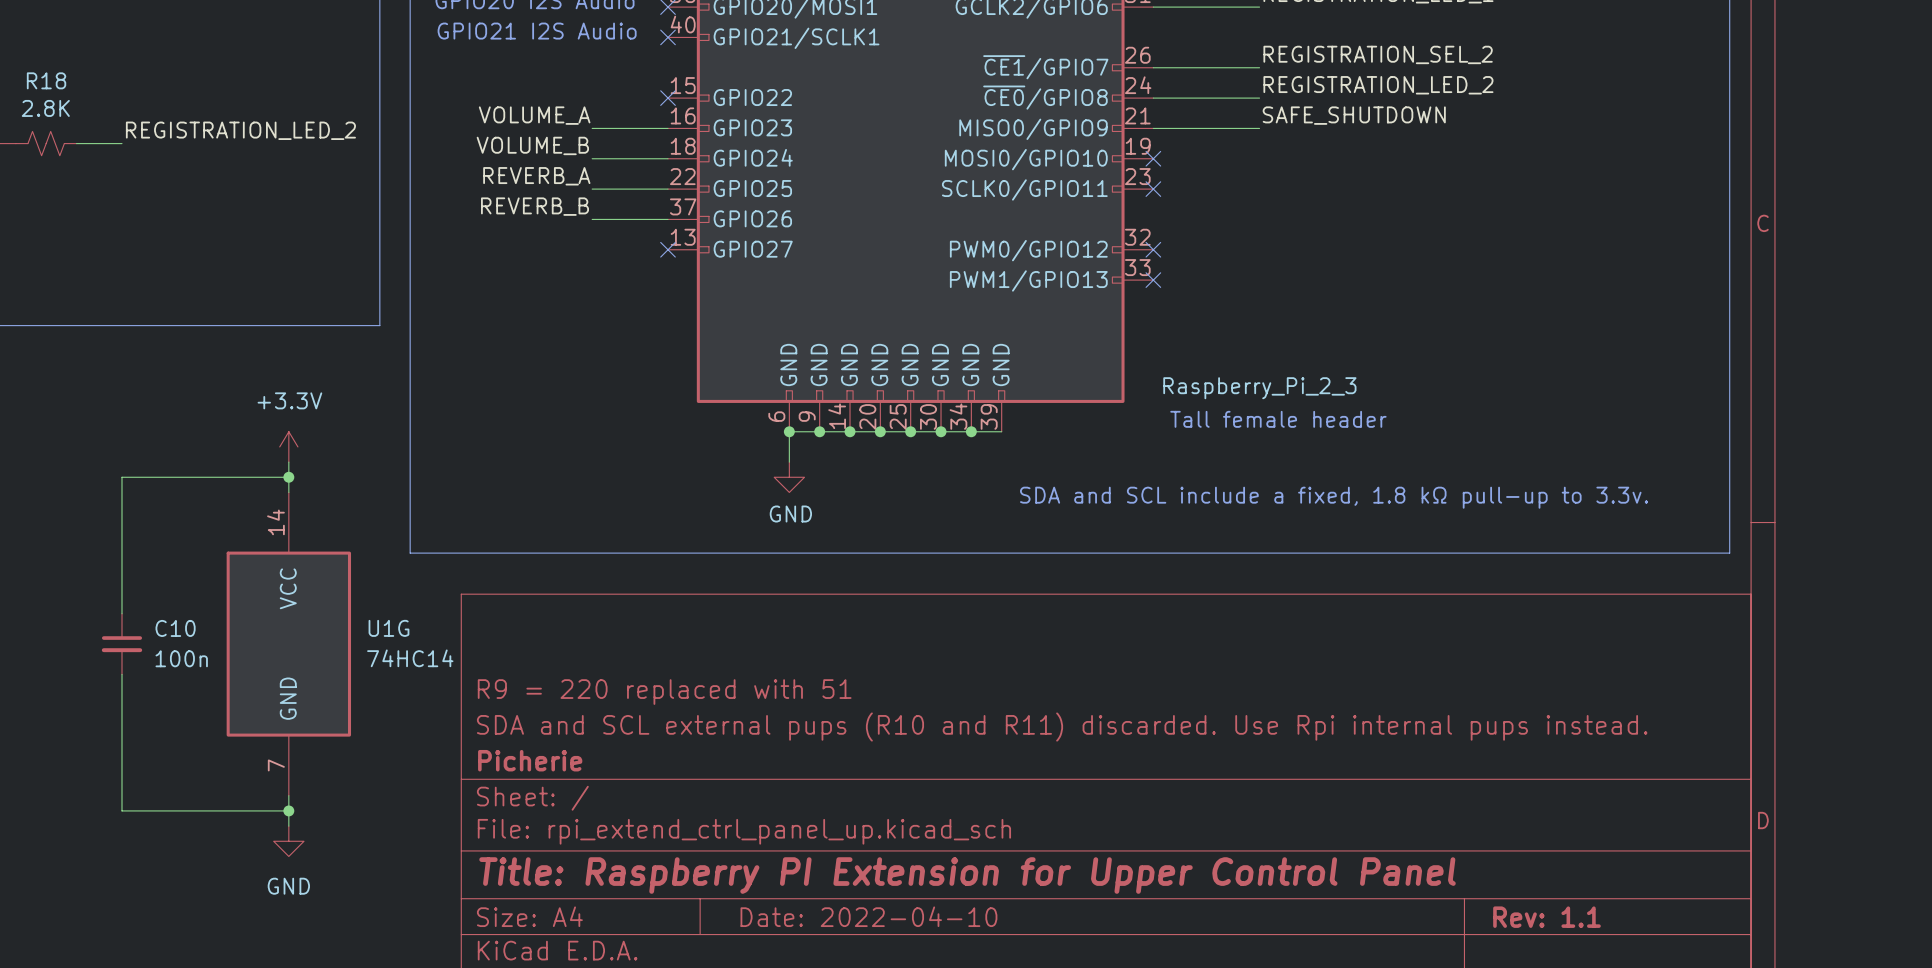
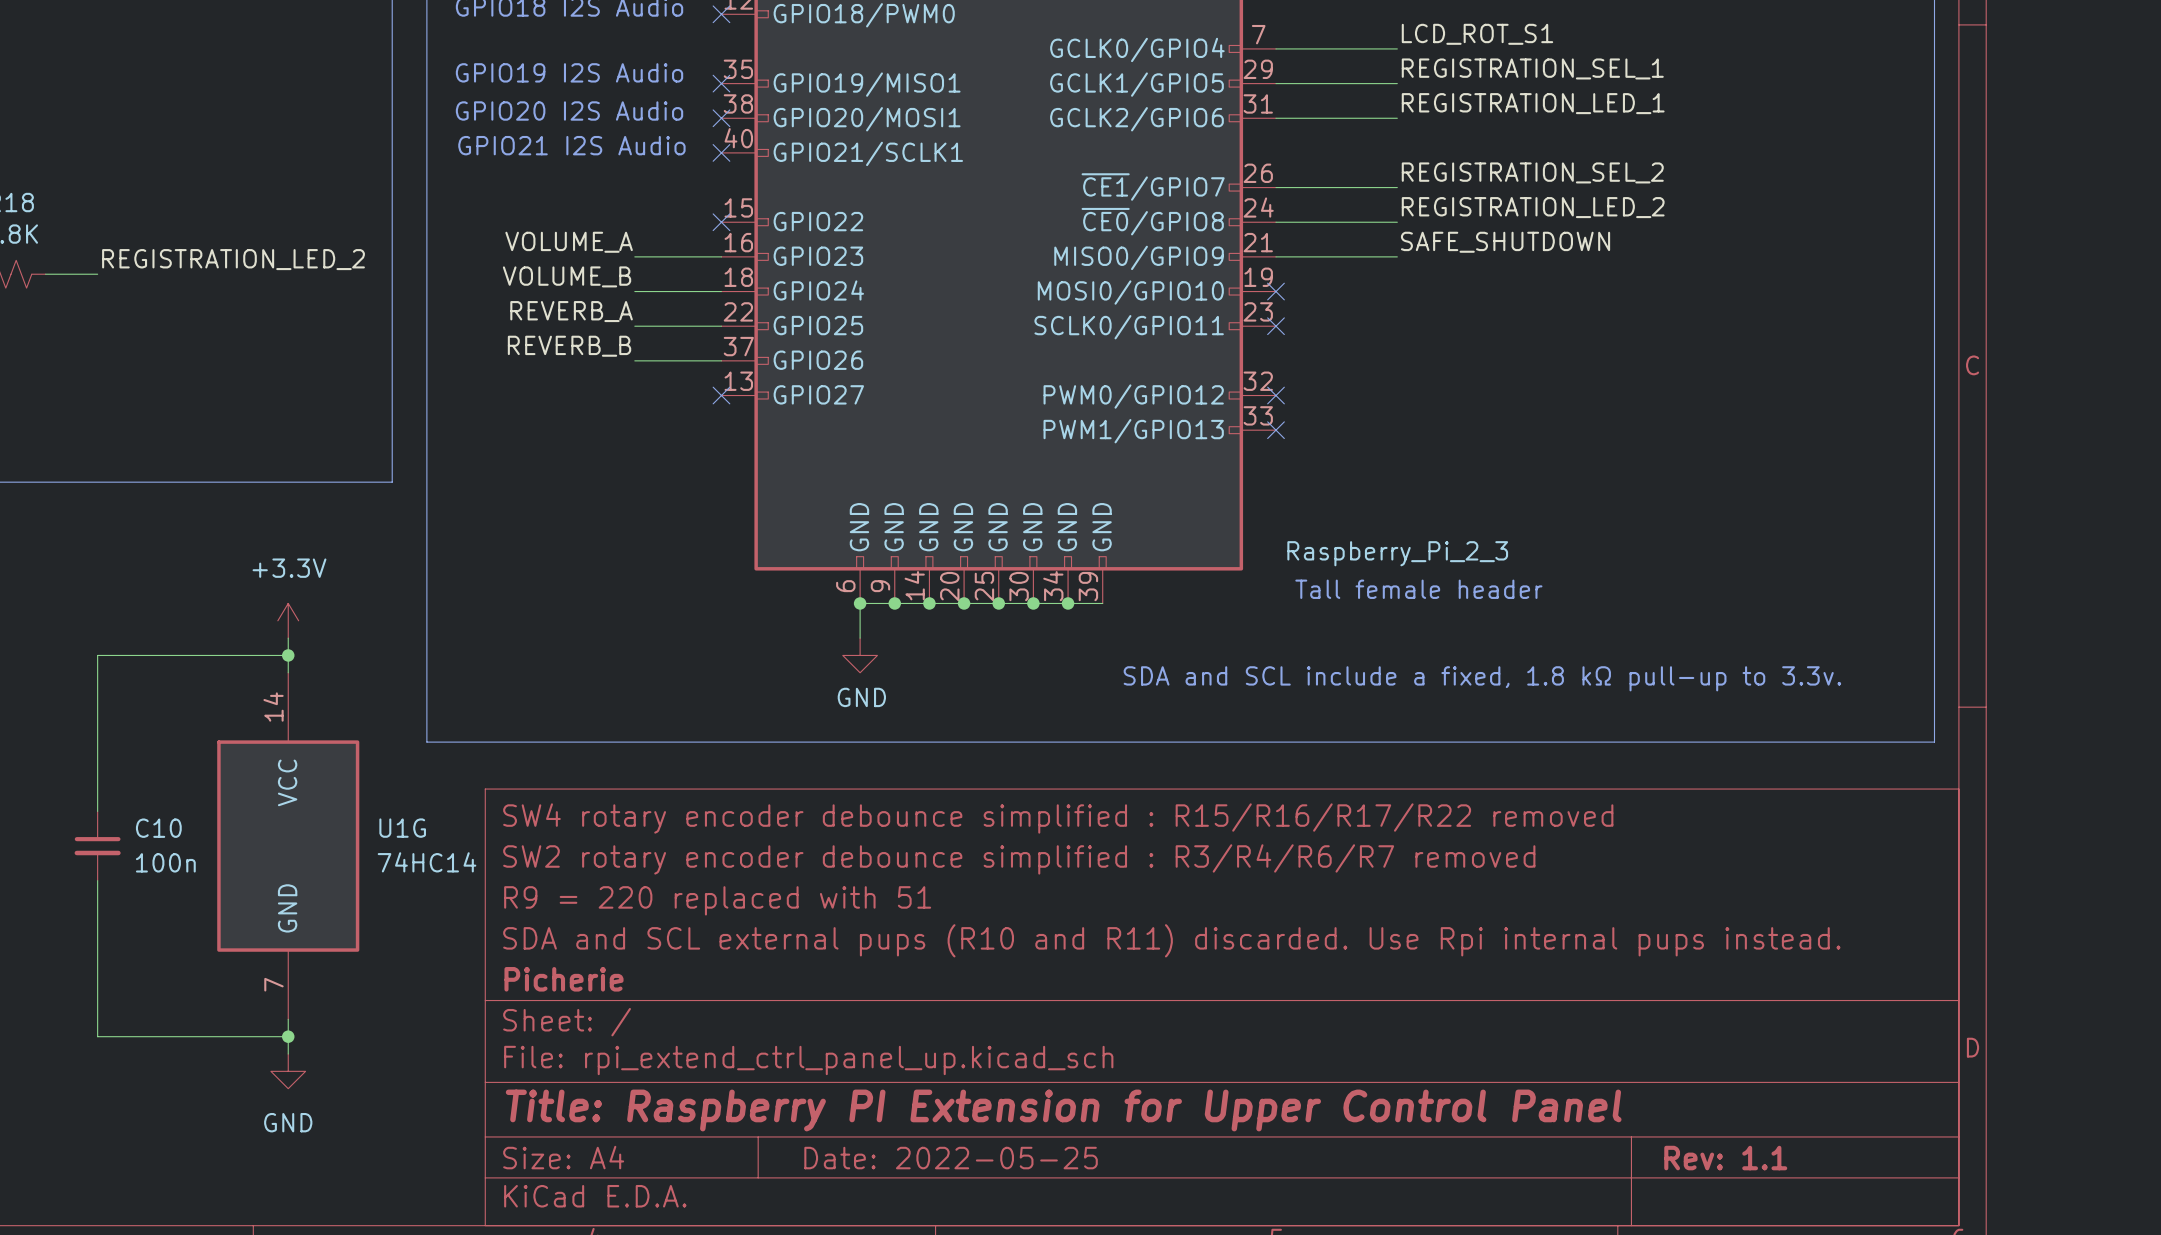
title block: none -> SW4 rotary encoder debounce simplified : R15/R16/R17/R22 removed (1058, 818)
title block: none -> SW2 rotary encoder debounce simplified : R3/R4/R6/R7 removed (1019, 859)
title block: Date: 2022-04-10 (868, 916) -> Date: 2022-05-25 (951, 1158)

